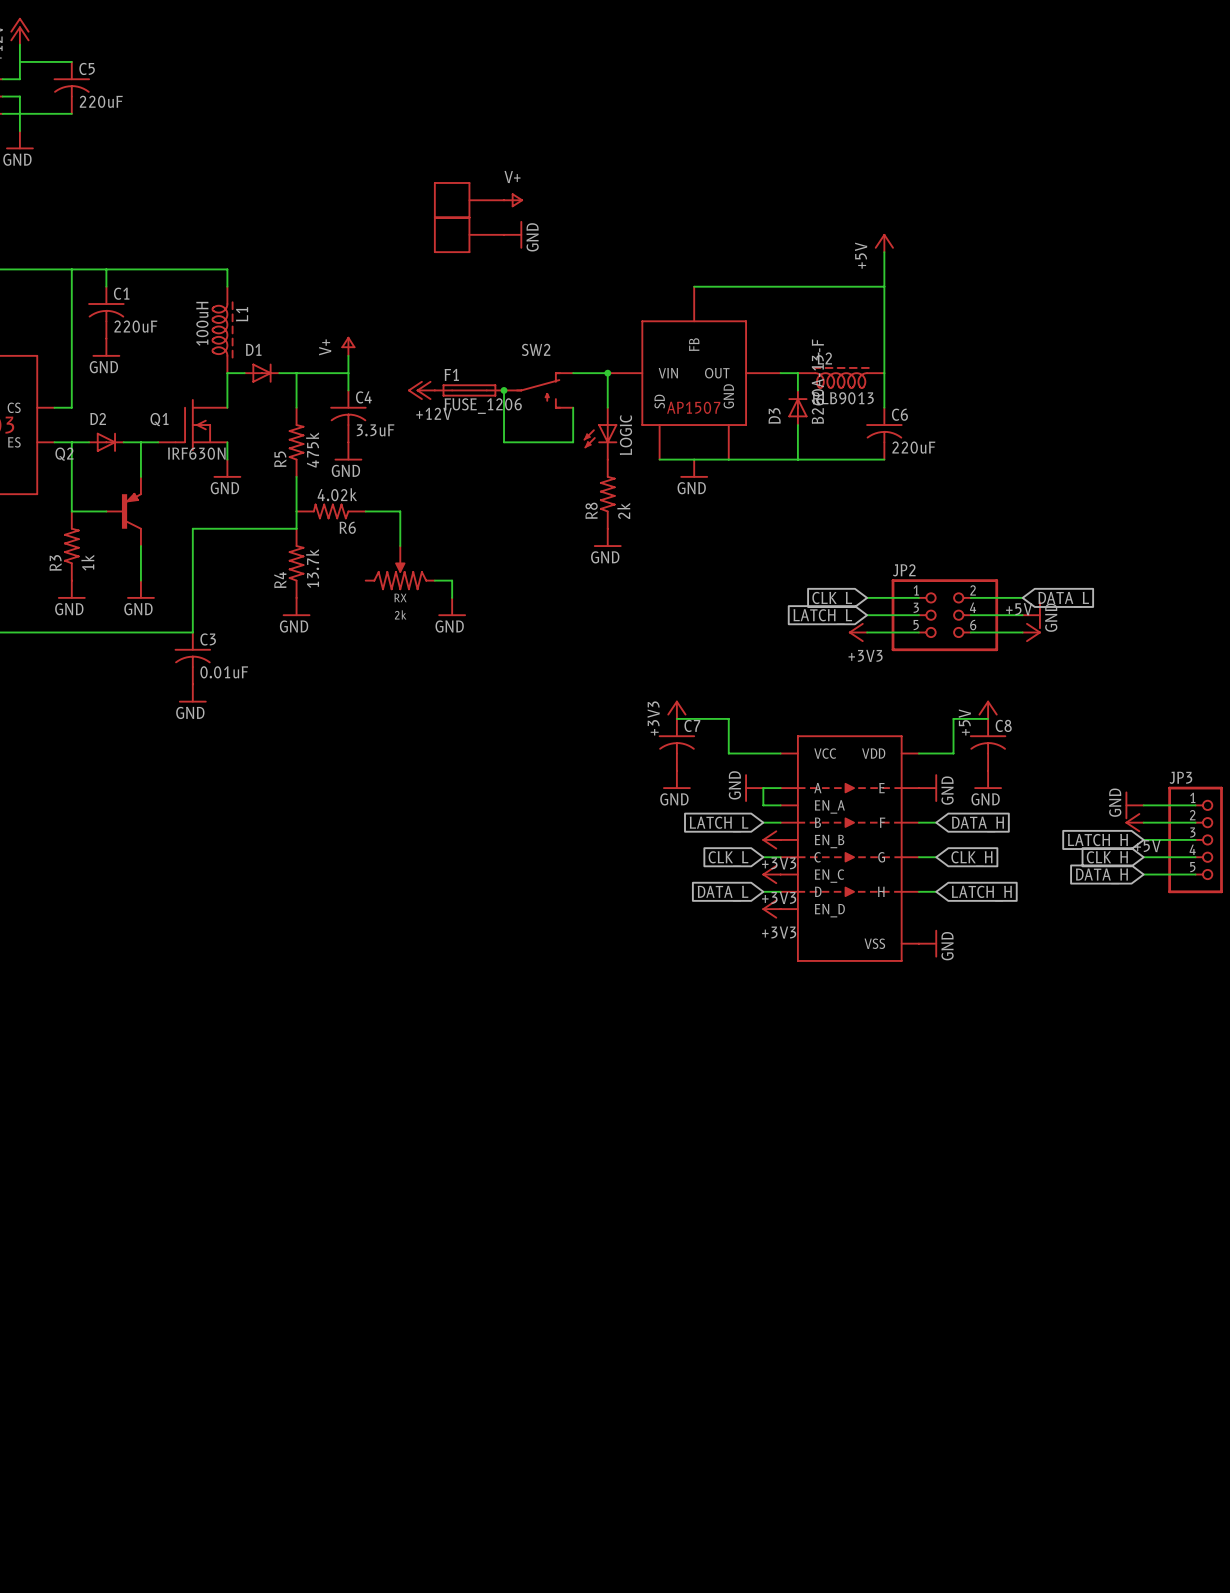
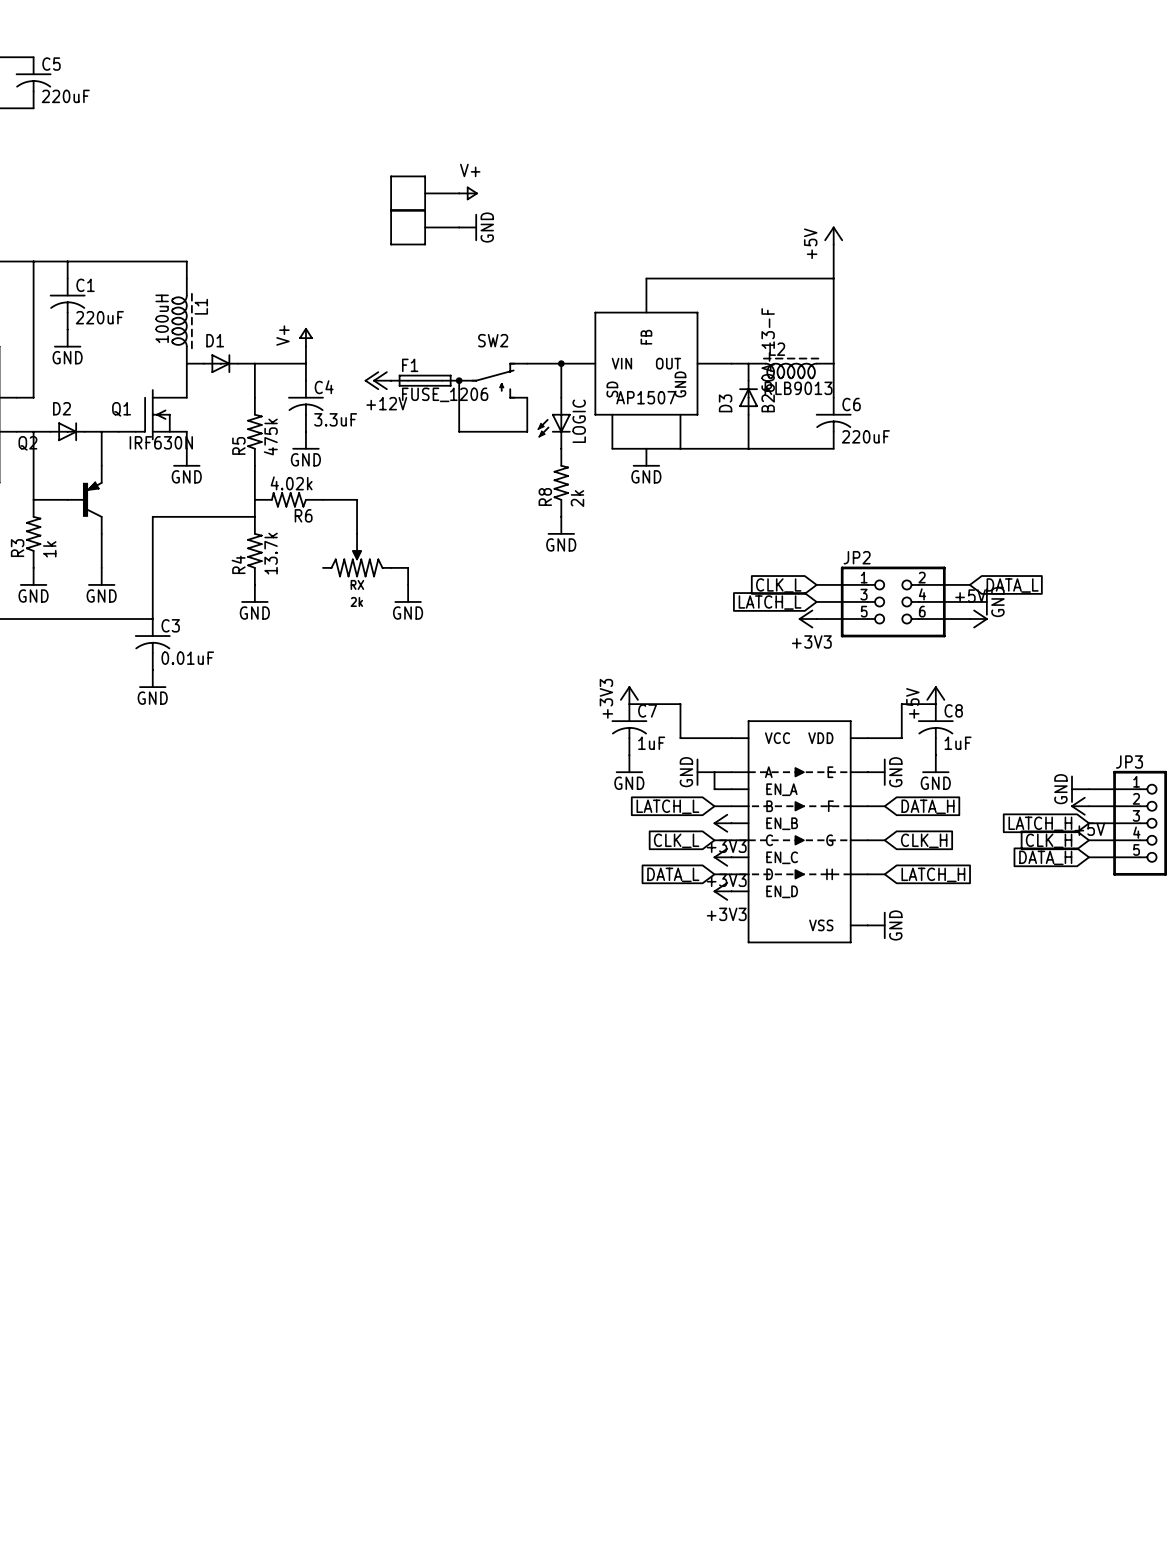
C7 value: none -> 1uF (651, 743)
C8 value: none -> 1uF (958, 743)

